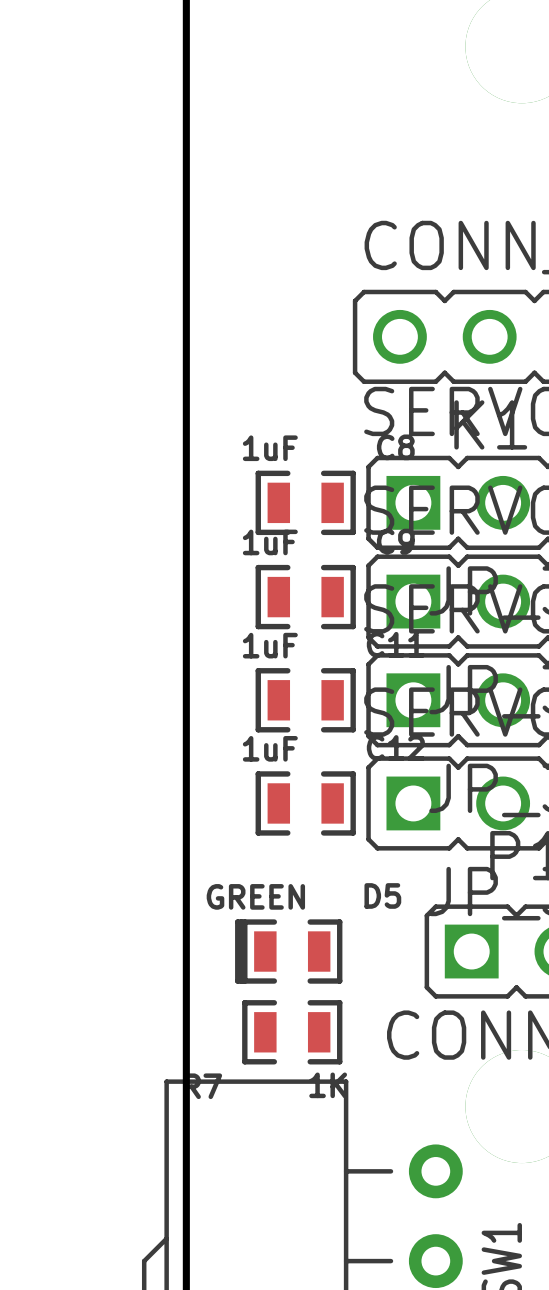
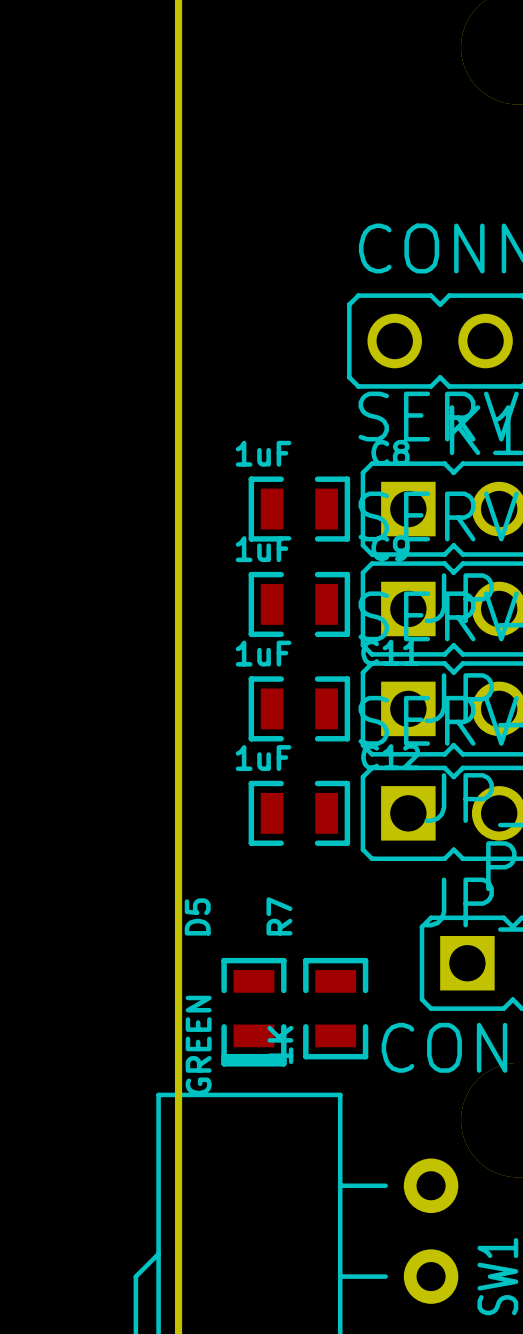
D5 rotation: 0° (288, 951) -> 90° counterclockwise (253, 1012)
R7 rotation: 0° (292, 1032) -> 90° clockwise (335, 1008)
R7 position: (292, 1032) -> (335, 1008)

